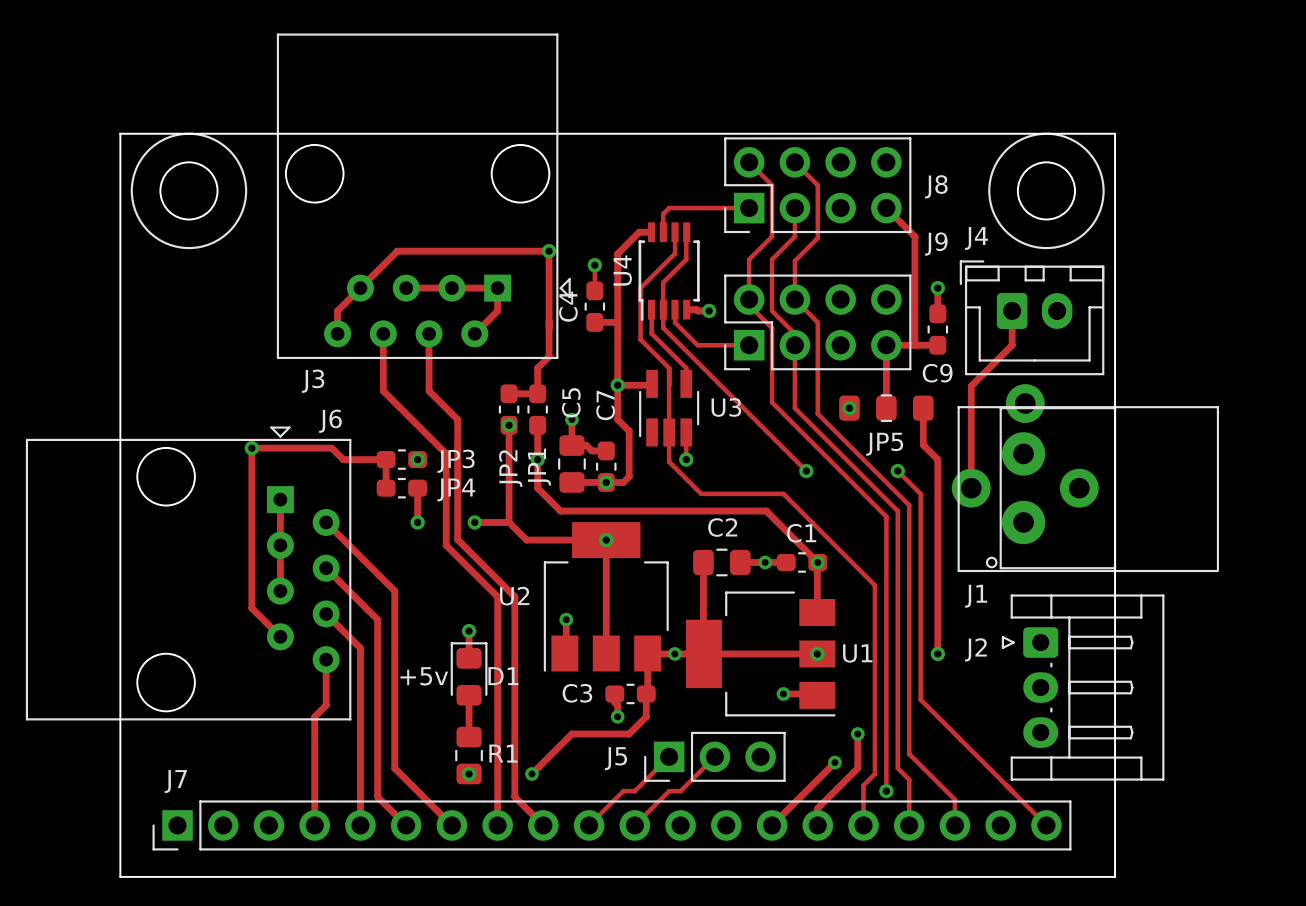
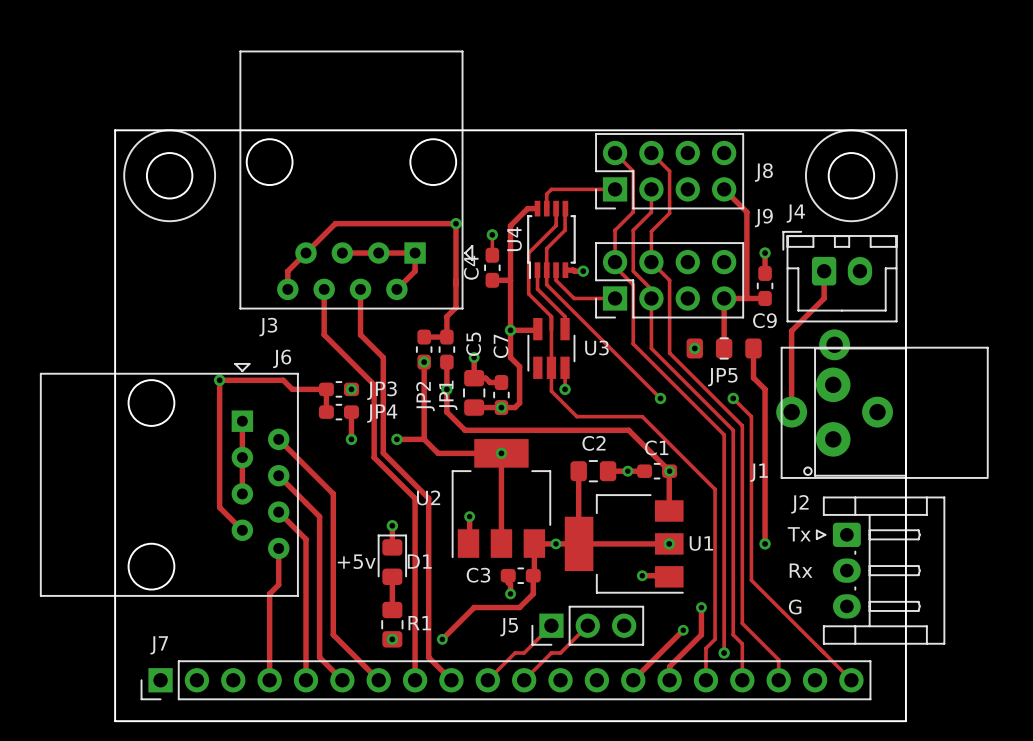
J1 name position: J1 (976, 596) -> J1 (759, 472)
text: none -> Tx (799, 534)
J2 name position: J2 (975, 649) -> J2 (799, 504)
text: none -> Rx (801, 570)
text: none -> G (795, 607)

